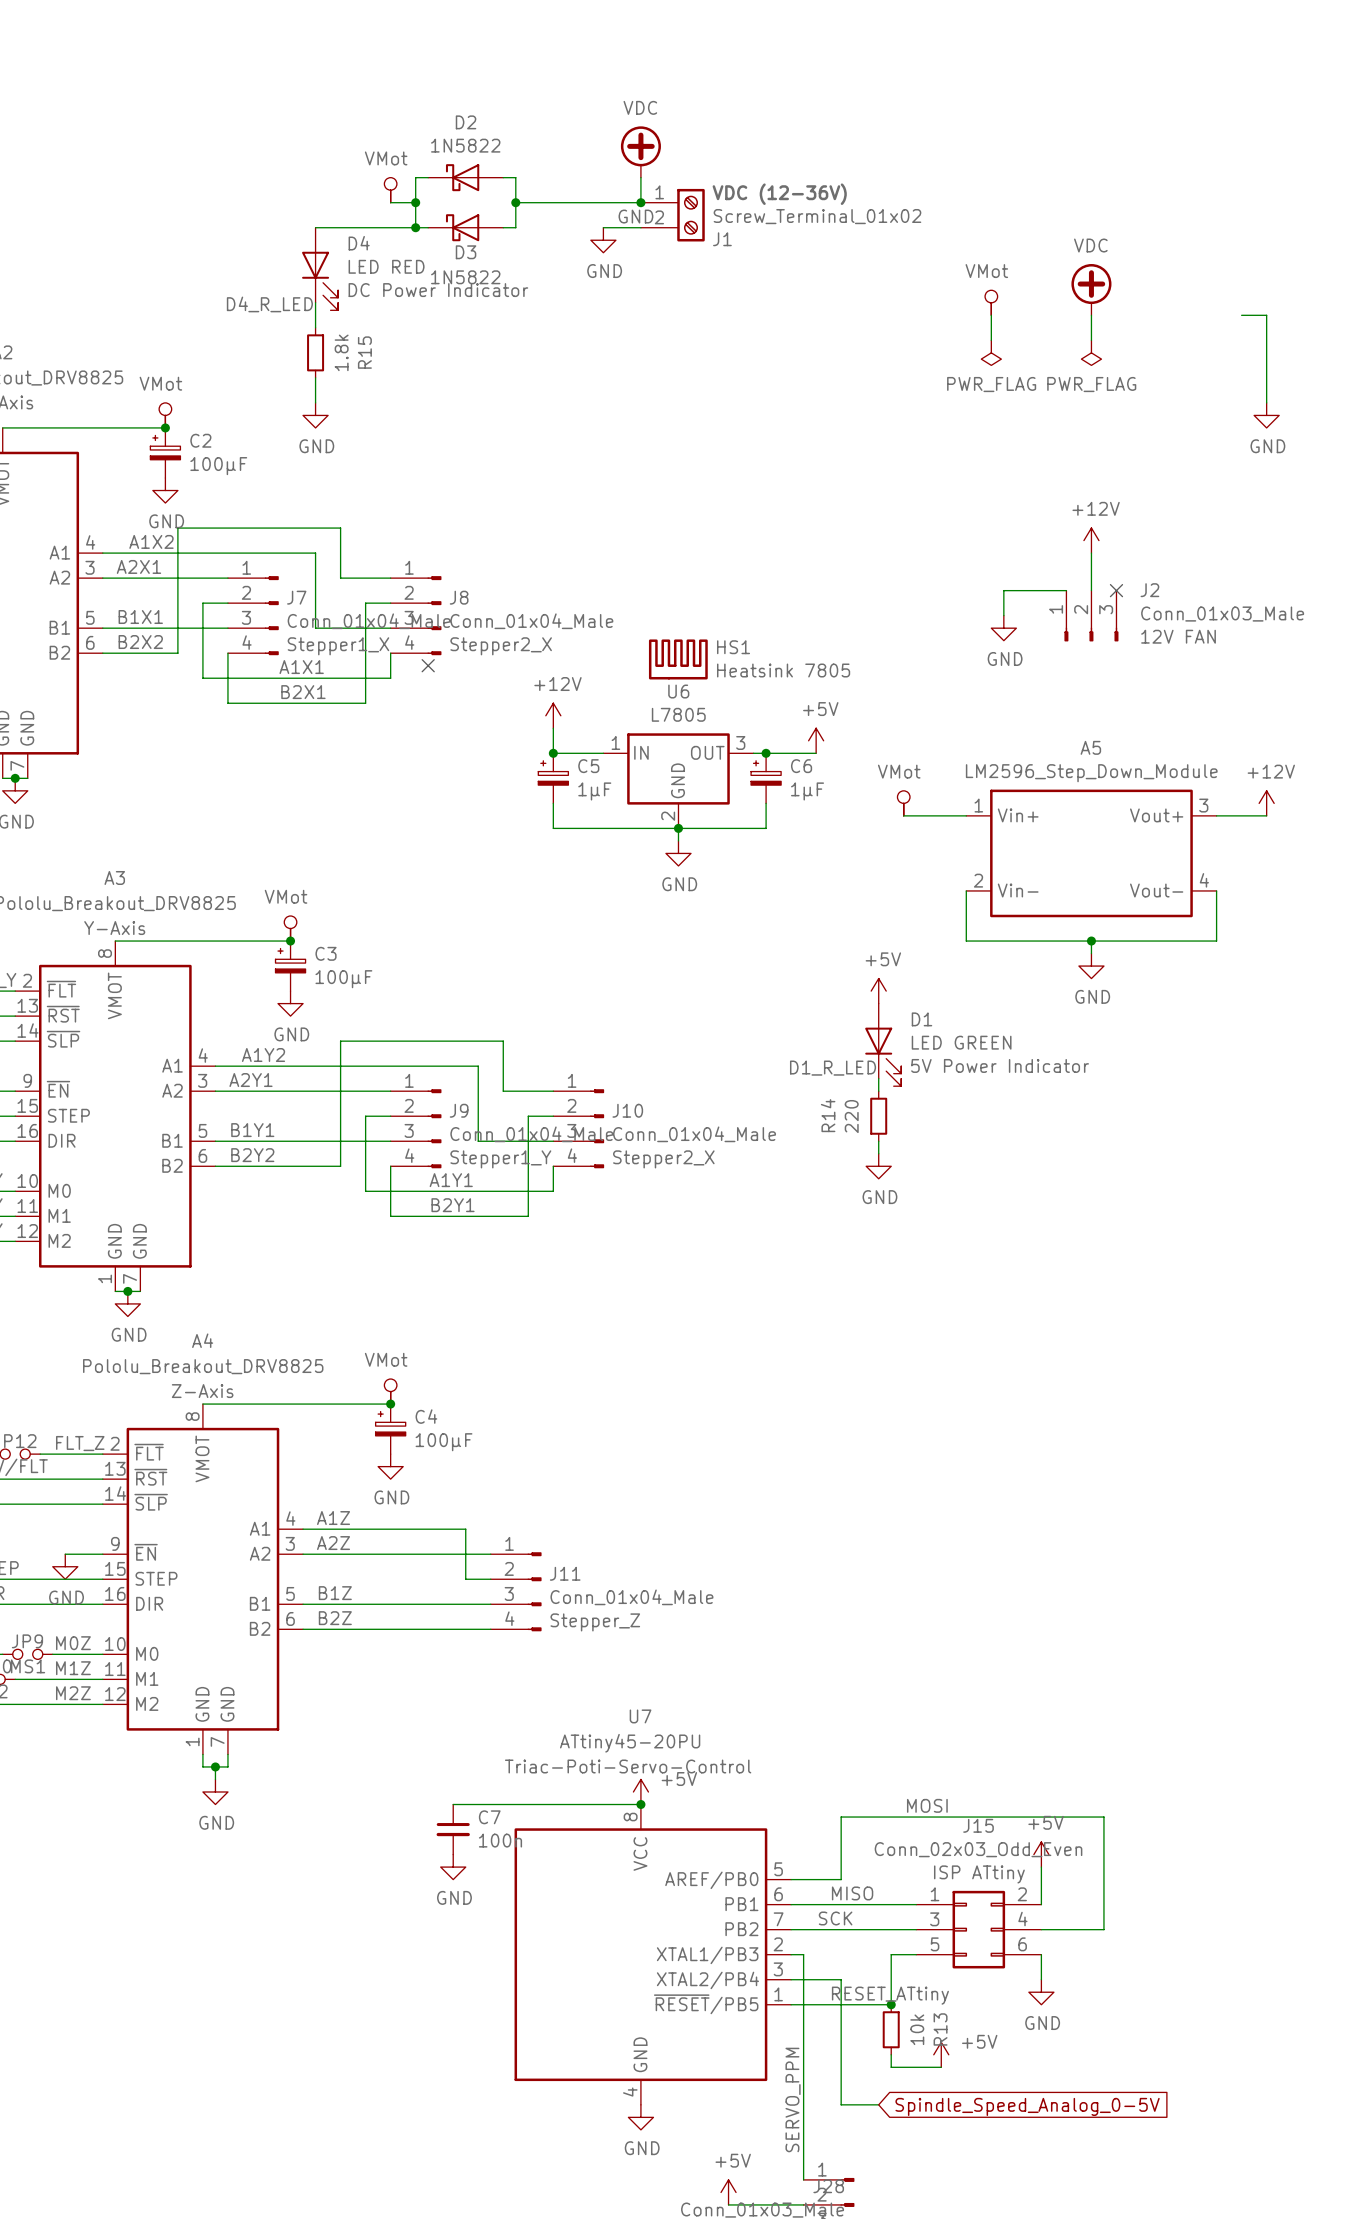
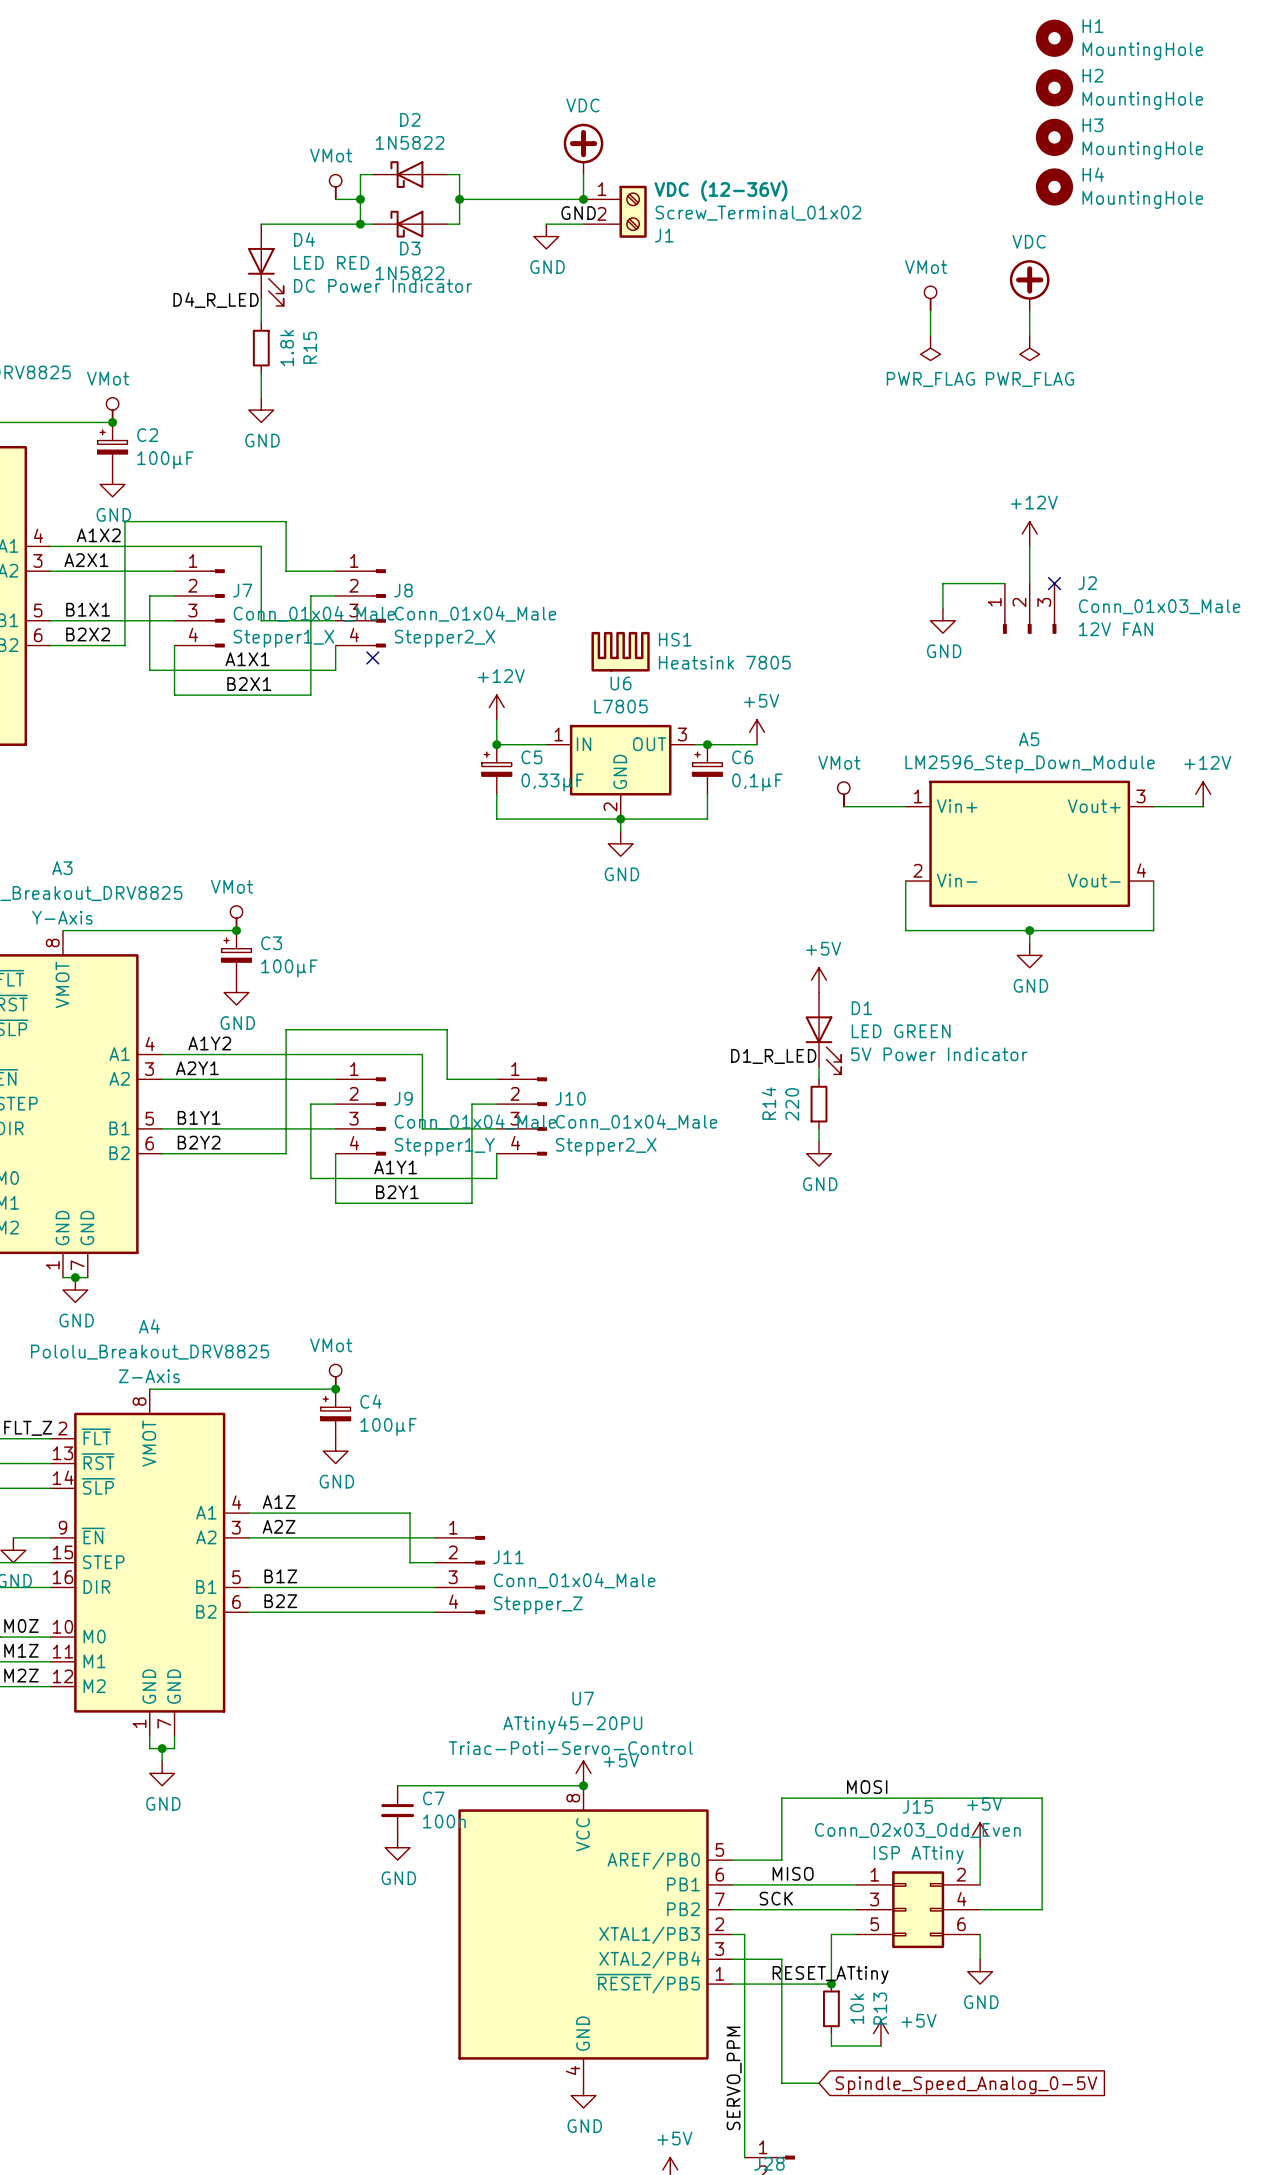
H1: none -> MountingHole (1054, 38)
H2: none -> MountingHole (1054, 87)
H3: none -> MountingHole (1054, 137)
H4: none -> MountingHole (1054, 186)
wire: (1241, 315) (1266, 315) (1266, 402) -> none
power symbol: GND (1266, 415) -> none
C5 value: 1µF (594, 791) -> 0,33µF (552, 782)
C6 value: 1µF (807, 791) -> 0,1µF (757, 782)

